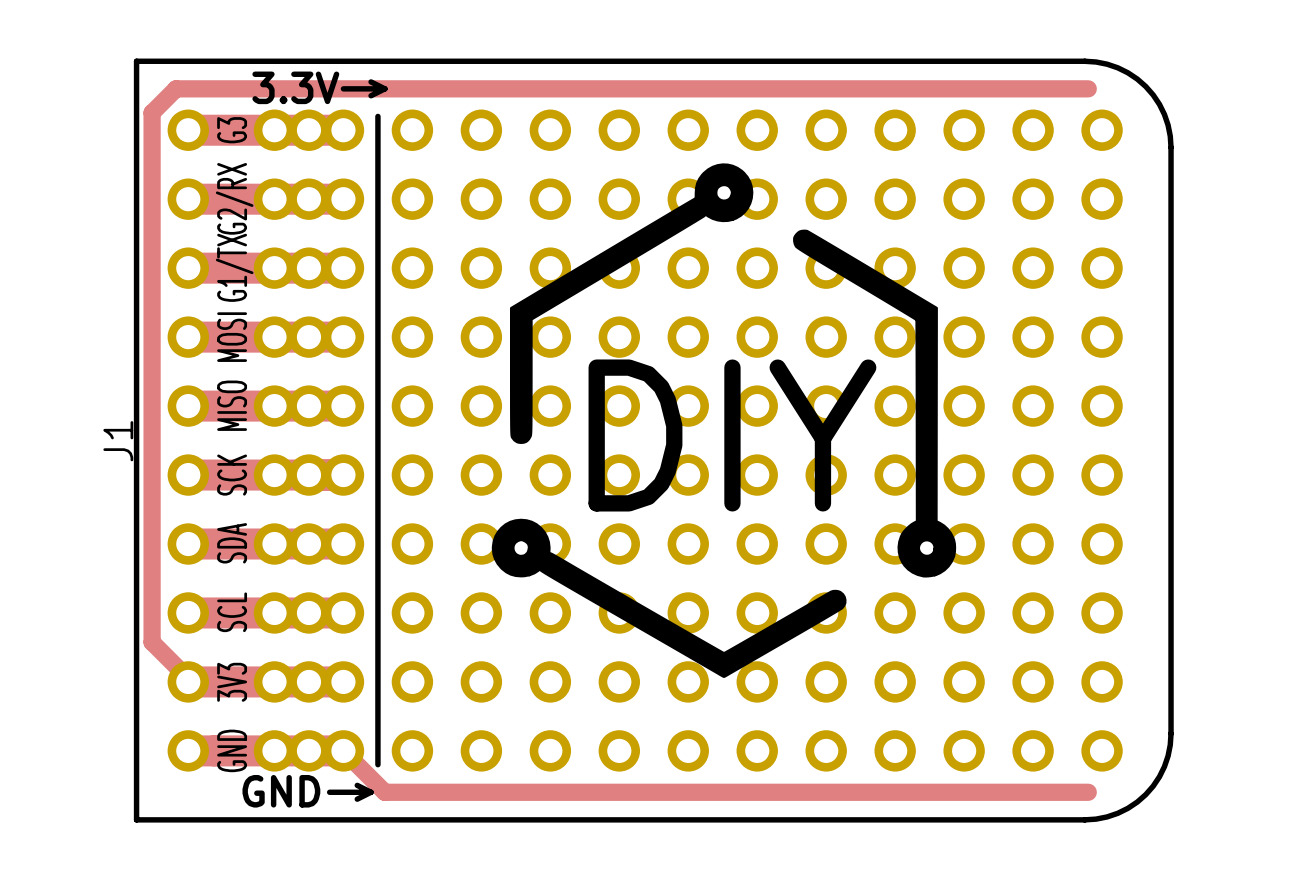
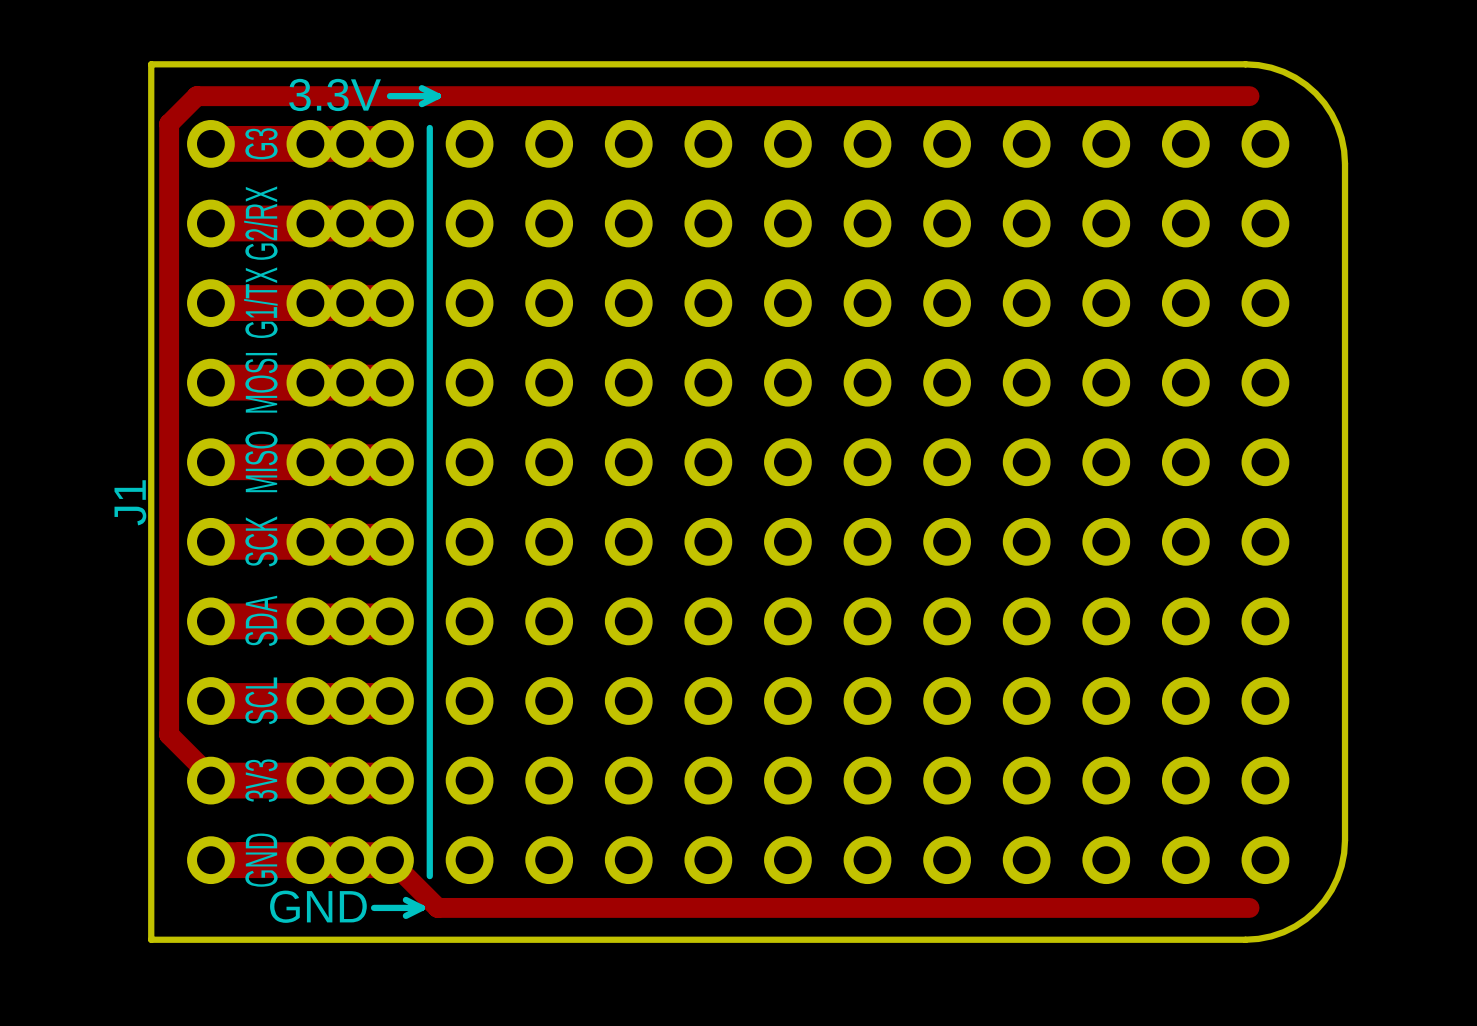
drawing: [491, 163, 957, 678] -> none
text: DIY (732, 435) -> none

